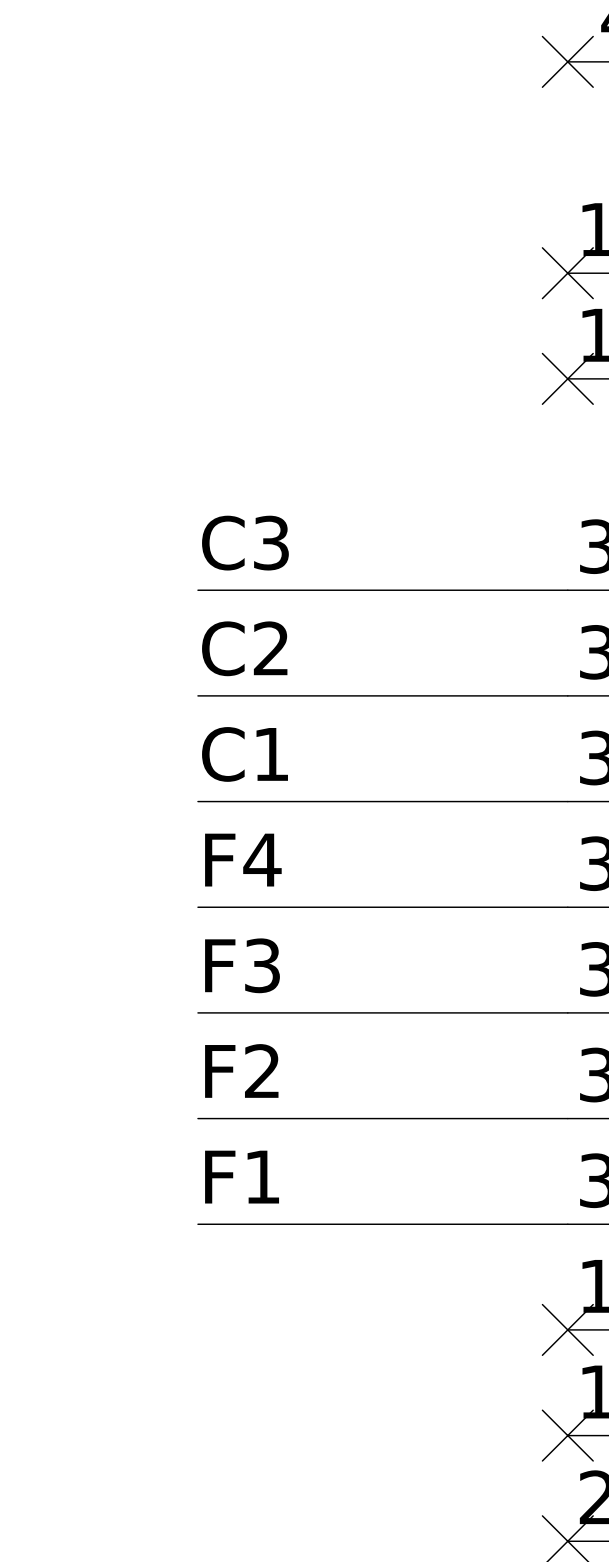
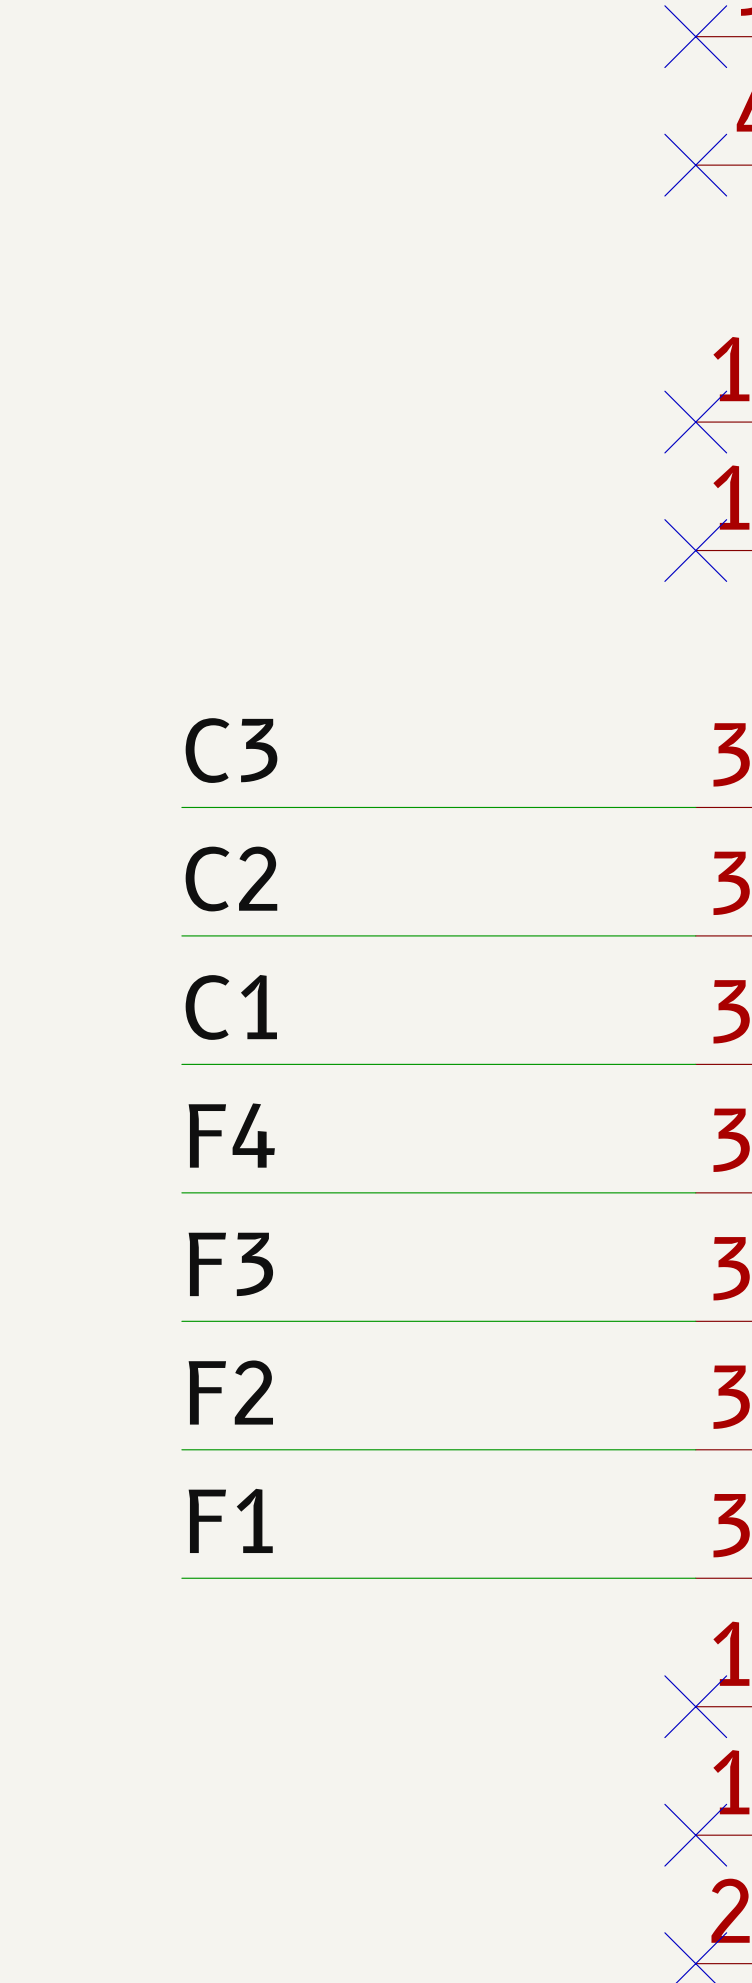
label position: C3 (245, 543) -> C3 (231, 750)
wire: none -> (181, 807) (246, 807)
label position: C2 (244, 648) -> C2 (231, 879)
wire: none -> (181, 935) (246, 935)
label position: C1 (245, 754) -> C1 (231, 1007)
wire: none -> (181, 1064) (246, 1064)
label position: F4 (243, 860) -> F4 (231, 1135)
wire: none -> (181, 1192) (246, 1192)
label position: F3 (242, 965) -> F3 (230, 1264)
wire: none -> (181, 1321) (246, 1321)
label position: F2 (241, 1070) -> F2 (230, 1392)
wire: none -> (181, 1449) (246, 1449)
label position: F1 (242, 1177) -> F1 (230, 1520)
wire: none -> (181, 1578) (246, 1578)

